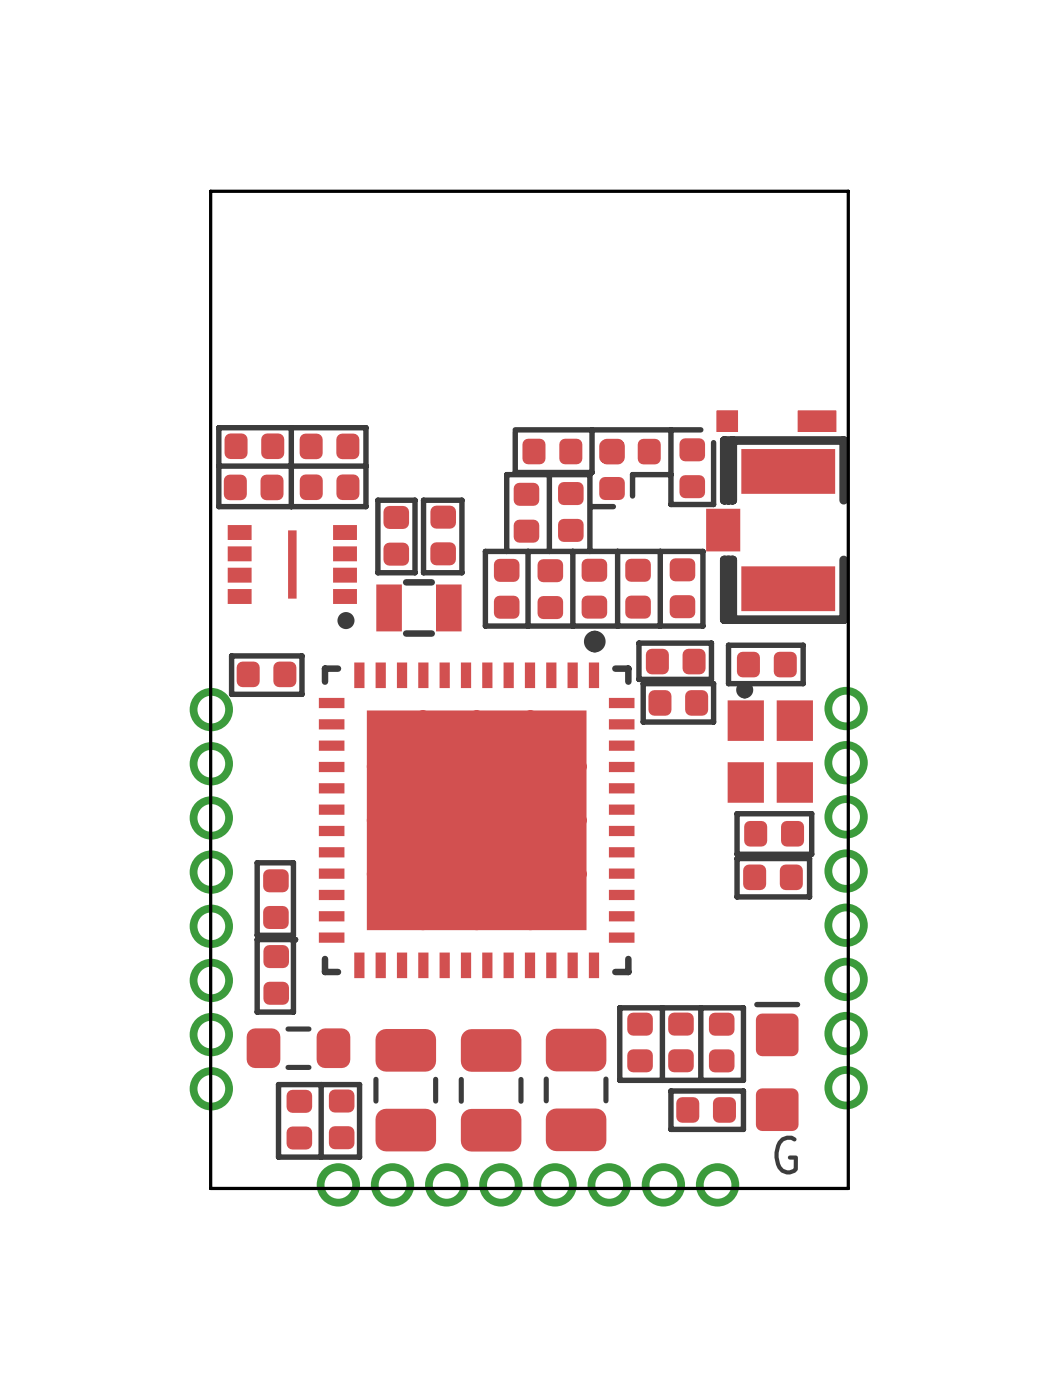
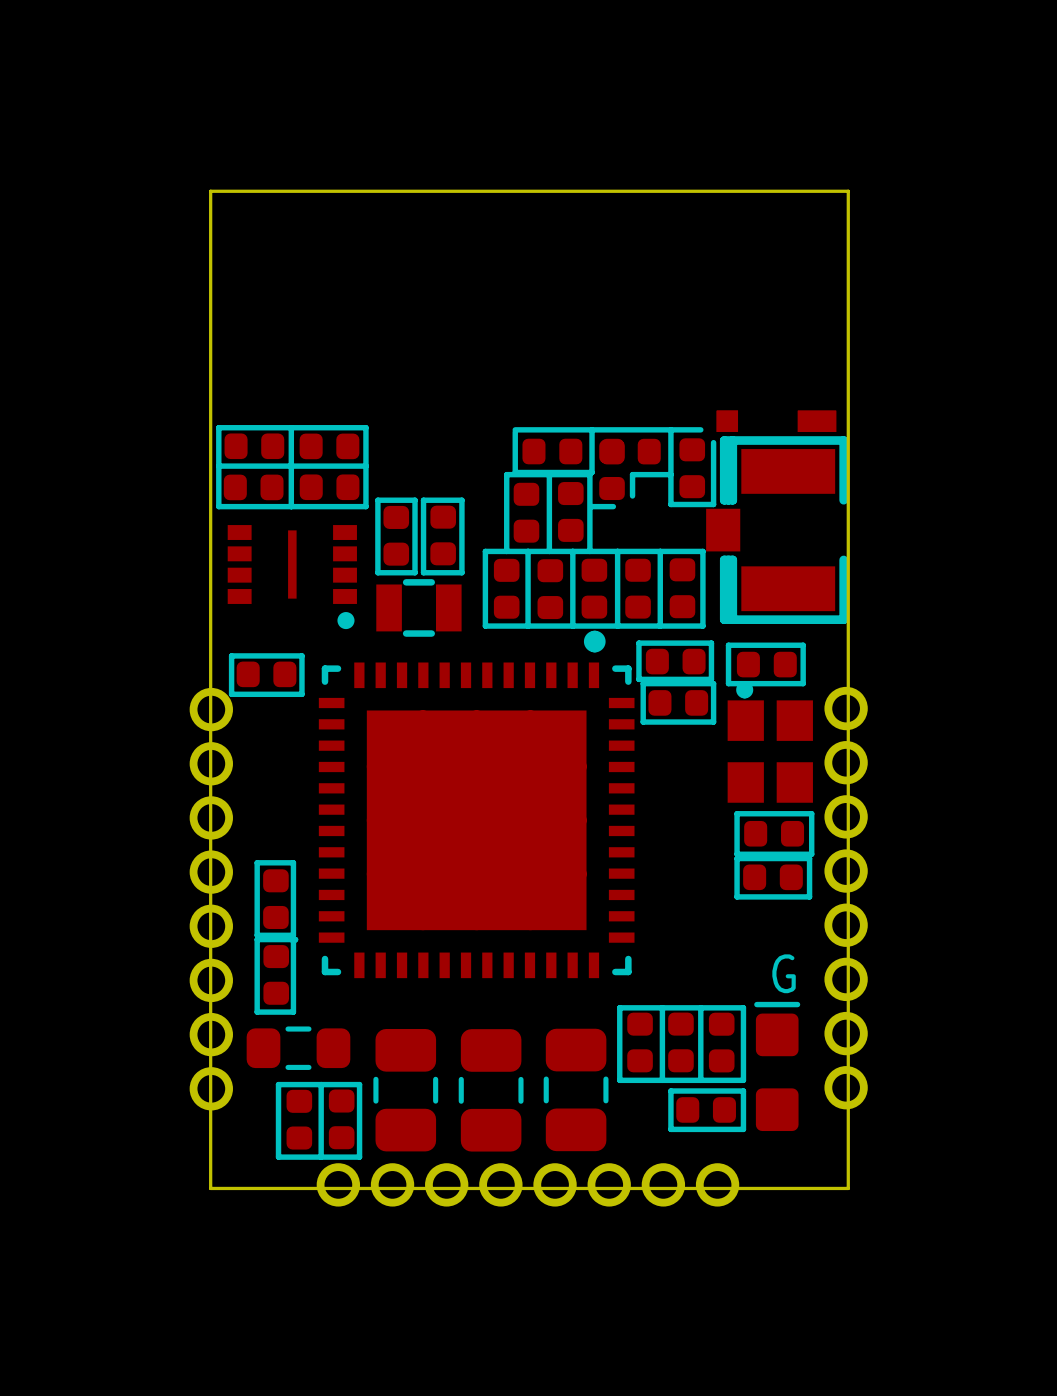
text position: G (786, 1155) -> G (784, 973)

